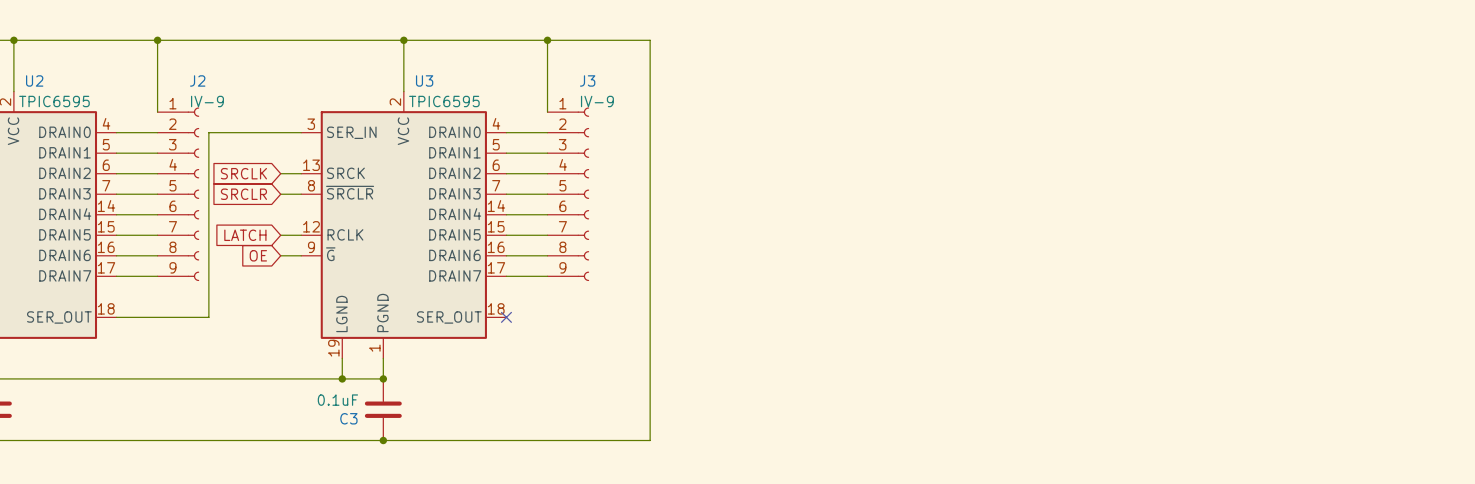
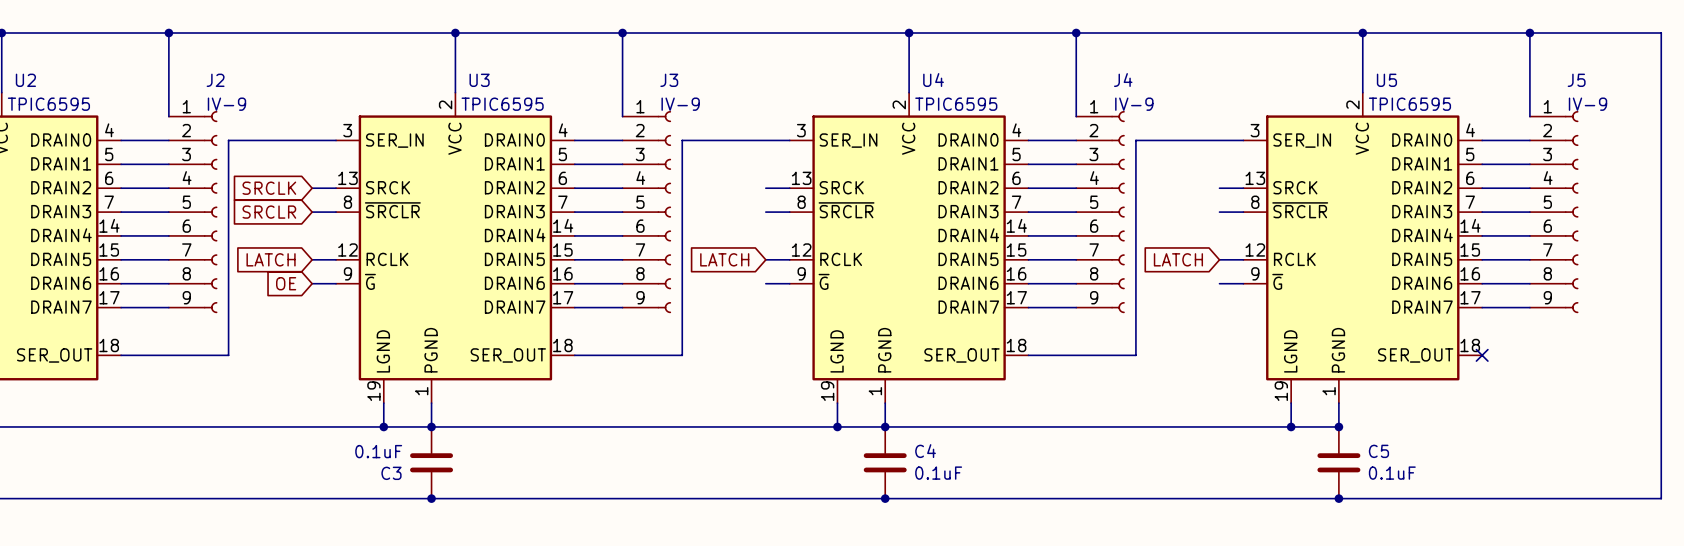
wire: (650, 40) (650, 440) -> (741, 33) (1661, 33) (1661, 498) (741, 498)
wire: none -> (909, 33) (909, 92)
junction: none -> (909, 33)
wire: none -> (1076, 33) (1076, 116)
junction: none -> (1076, 33)
wire: none -> (1362, 33) (1362, 92)
junction: none -> (1362, 33)
wire: none -> (1529, 33) (1529, 116)
junction: none -> (1529, 33)
wire: none -> (789, 140) (682, 140) (682, 355) (574, 355)
wire: none -> (1028, 140) (1076, 140)
wire: none -> (1243, 140) (1135, 140) (1135, 355) (1028, 355)
wire: none -> (1482, 140) (1529, 140)
wire: none -> (1028, 164) (1076, 164)
wire: none -> (1482, 164) (1529, 164)
wire: none -> (765, 188) (789, 188)
wire: none -> (1028, 188) (1076, 188)
wire: none -> (1219, 188) (1243, 188)
wire: none -> (1482, 188) (1529, 188)
wire: none -> (765, 212) (789, 212)
wire: none -> (1028, 212) (1076, 212)
J4: none -> IV-9 (1100, 212)
wire: none -> (1219, 212) (1243, 212)
wire: none -> (1482, 212) (1529, 212)
J5: none -> IV-9 (1554, 212)
wire: none -> (1028, 235) (1076, 235)
wire: none -> (1482, 235) (1529, 235)
U4: none -> TPIC6595 (909, 247)
U5: none -> TPIC6595 (1362, 247)
global label: none -> LATCH (724, 259)
wire: none -> (765, 259) (789, 259)
wire: none -> (1028, 259) (1076, 259)
global label: none -> LATCH (1178, 259)
wire: none -> (1219, 259) (1243, 259)
wire: none -> (1482, 259) (1529, 259)
wire: none -> (765, 283) (789, 283)
wire: none -> (1028, 283) (1076, 283)
wire: none -> (1219, 283) (1243, 283)
wire: none -> (1482, 283) (1529, 283)
wire: none -> (1028, 307) (1076, 307)
wire: none -> (1482, 307) (1529, 307)
no-connect mark: (506, 317) -> none
no-connect mark: none -> (1482, 355)
wire: none -> (837, 403) (837, 426)
wire: none -> (885, 403) (885, 426)
wire: none -> (1291, 403) (1291, 426)
wire: none -> (1338, 403) (1338, 426) (431, 426)
junction: none -> (837, 426)
junction: none -> (885, 426)
junction: none -> (1291, 426)
junction: none -> (1338, 426)
C4: none -> 0.1uF (885, 462)
C5: none -> 0.1uF (1338, 462)
junction: none -> (885, 498)
junction: none -> (1338, 498)

